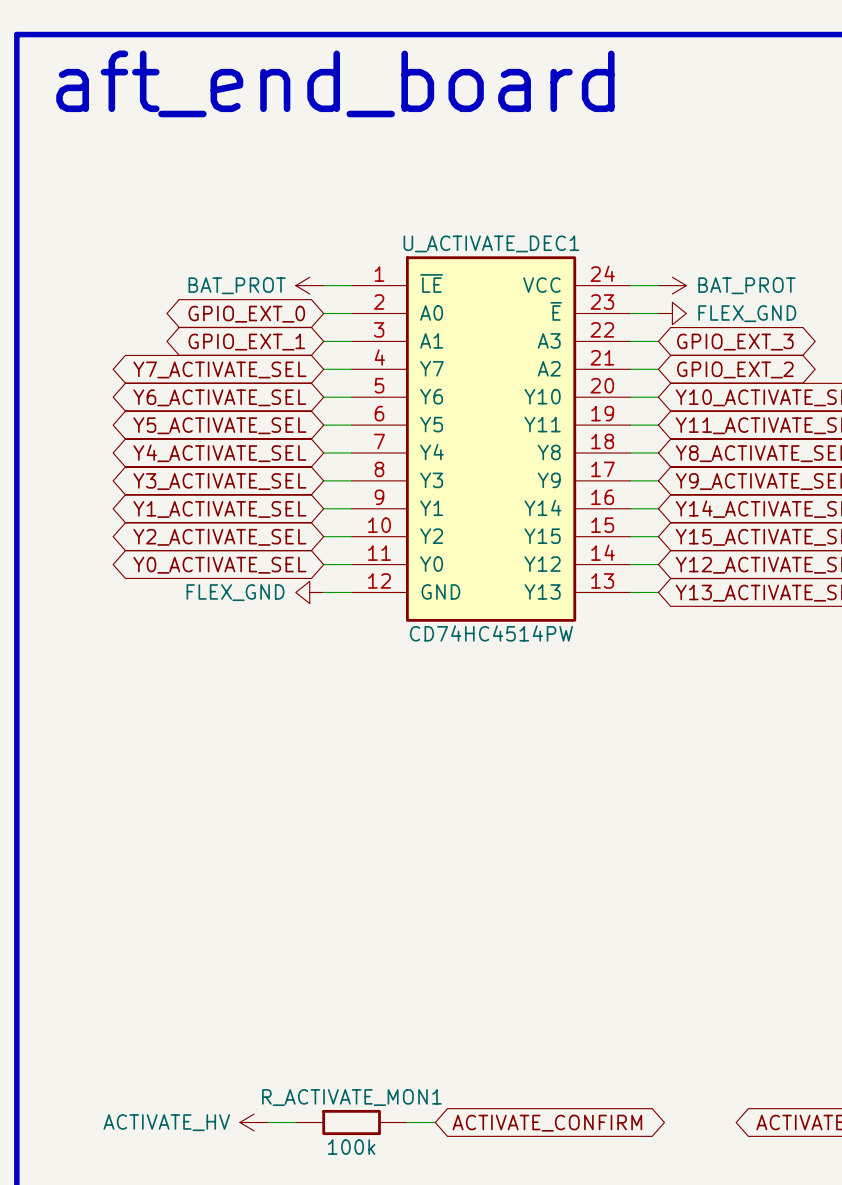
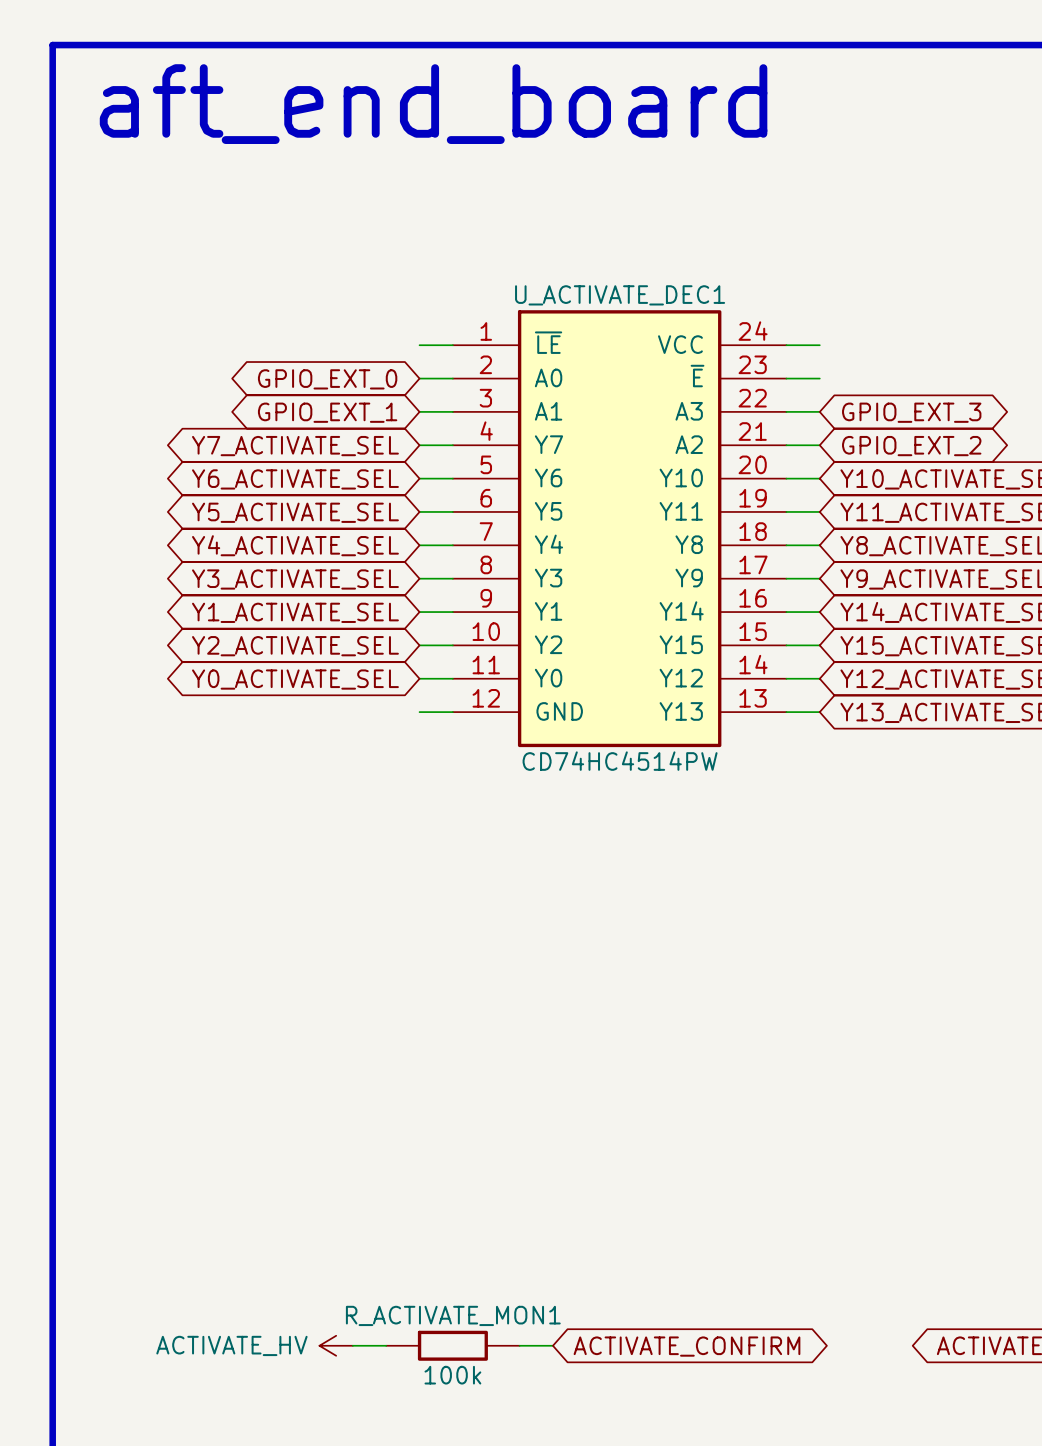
power symbol: BAT_PROT (309, 285) -> none
power symbol: BAT_PROT (672, 285) -> none
power symbol: FLEX_GND (672, 313) -> none
power symbol: FLEX_GND (309, 592) -> none

